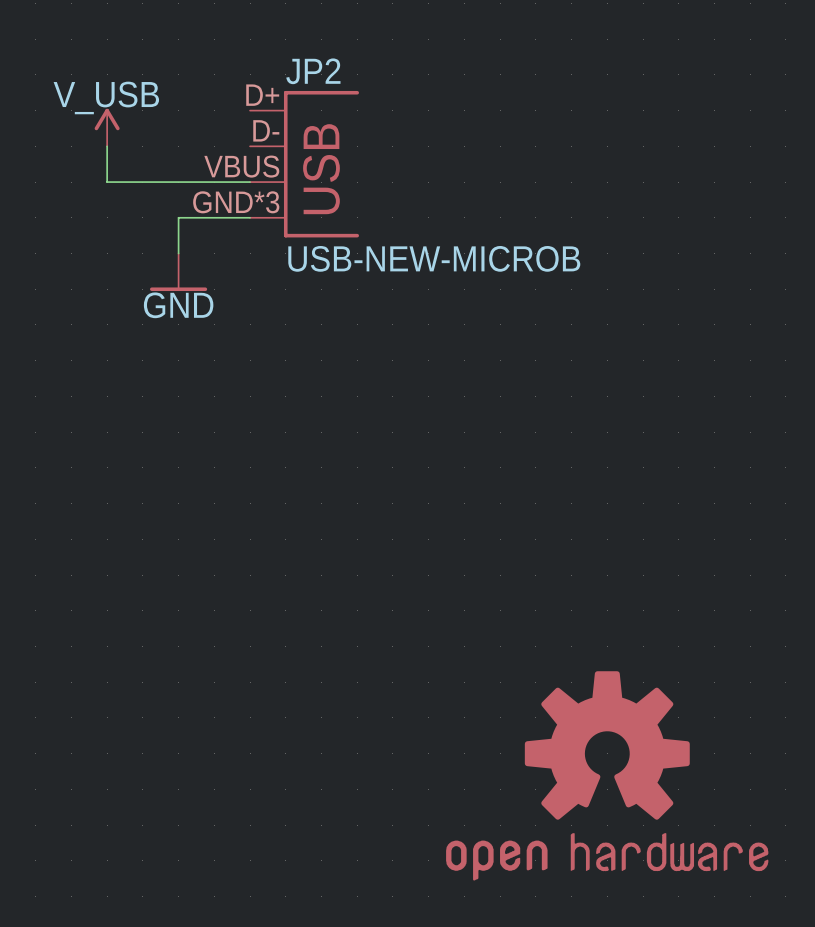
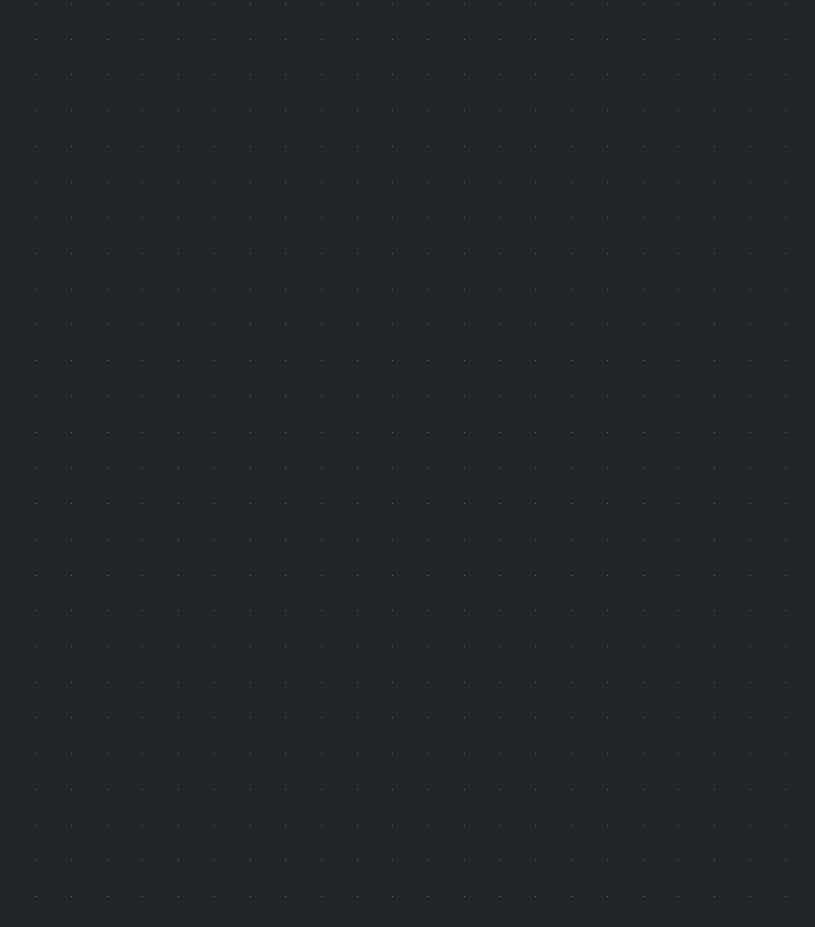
power symbol: V_USB (107, 127) -> none
wire: (107, 146) (107, 182) (250, 182) -> none
JP2: USB-NEW-MICROB (304, 164) -> none
wire: (250, 217) (178, 217) (178, 253) -> none
power symbol: GND (178, 272) -> none
part: (607, 775) -> none

